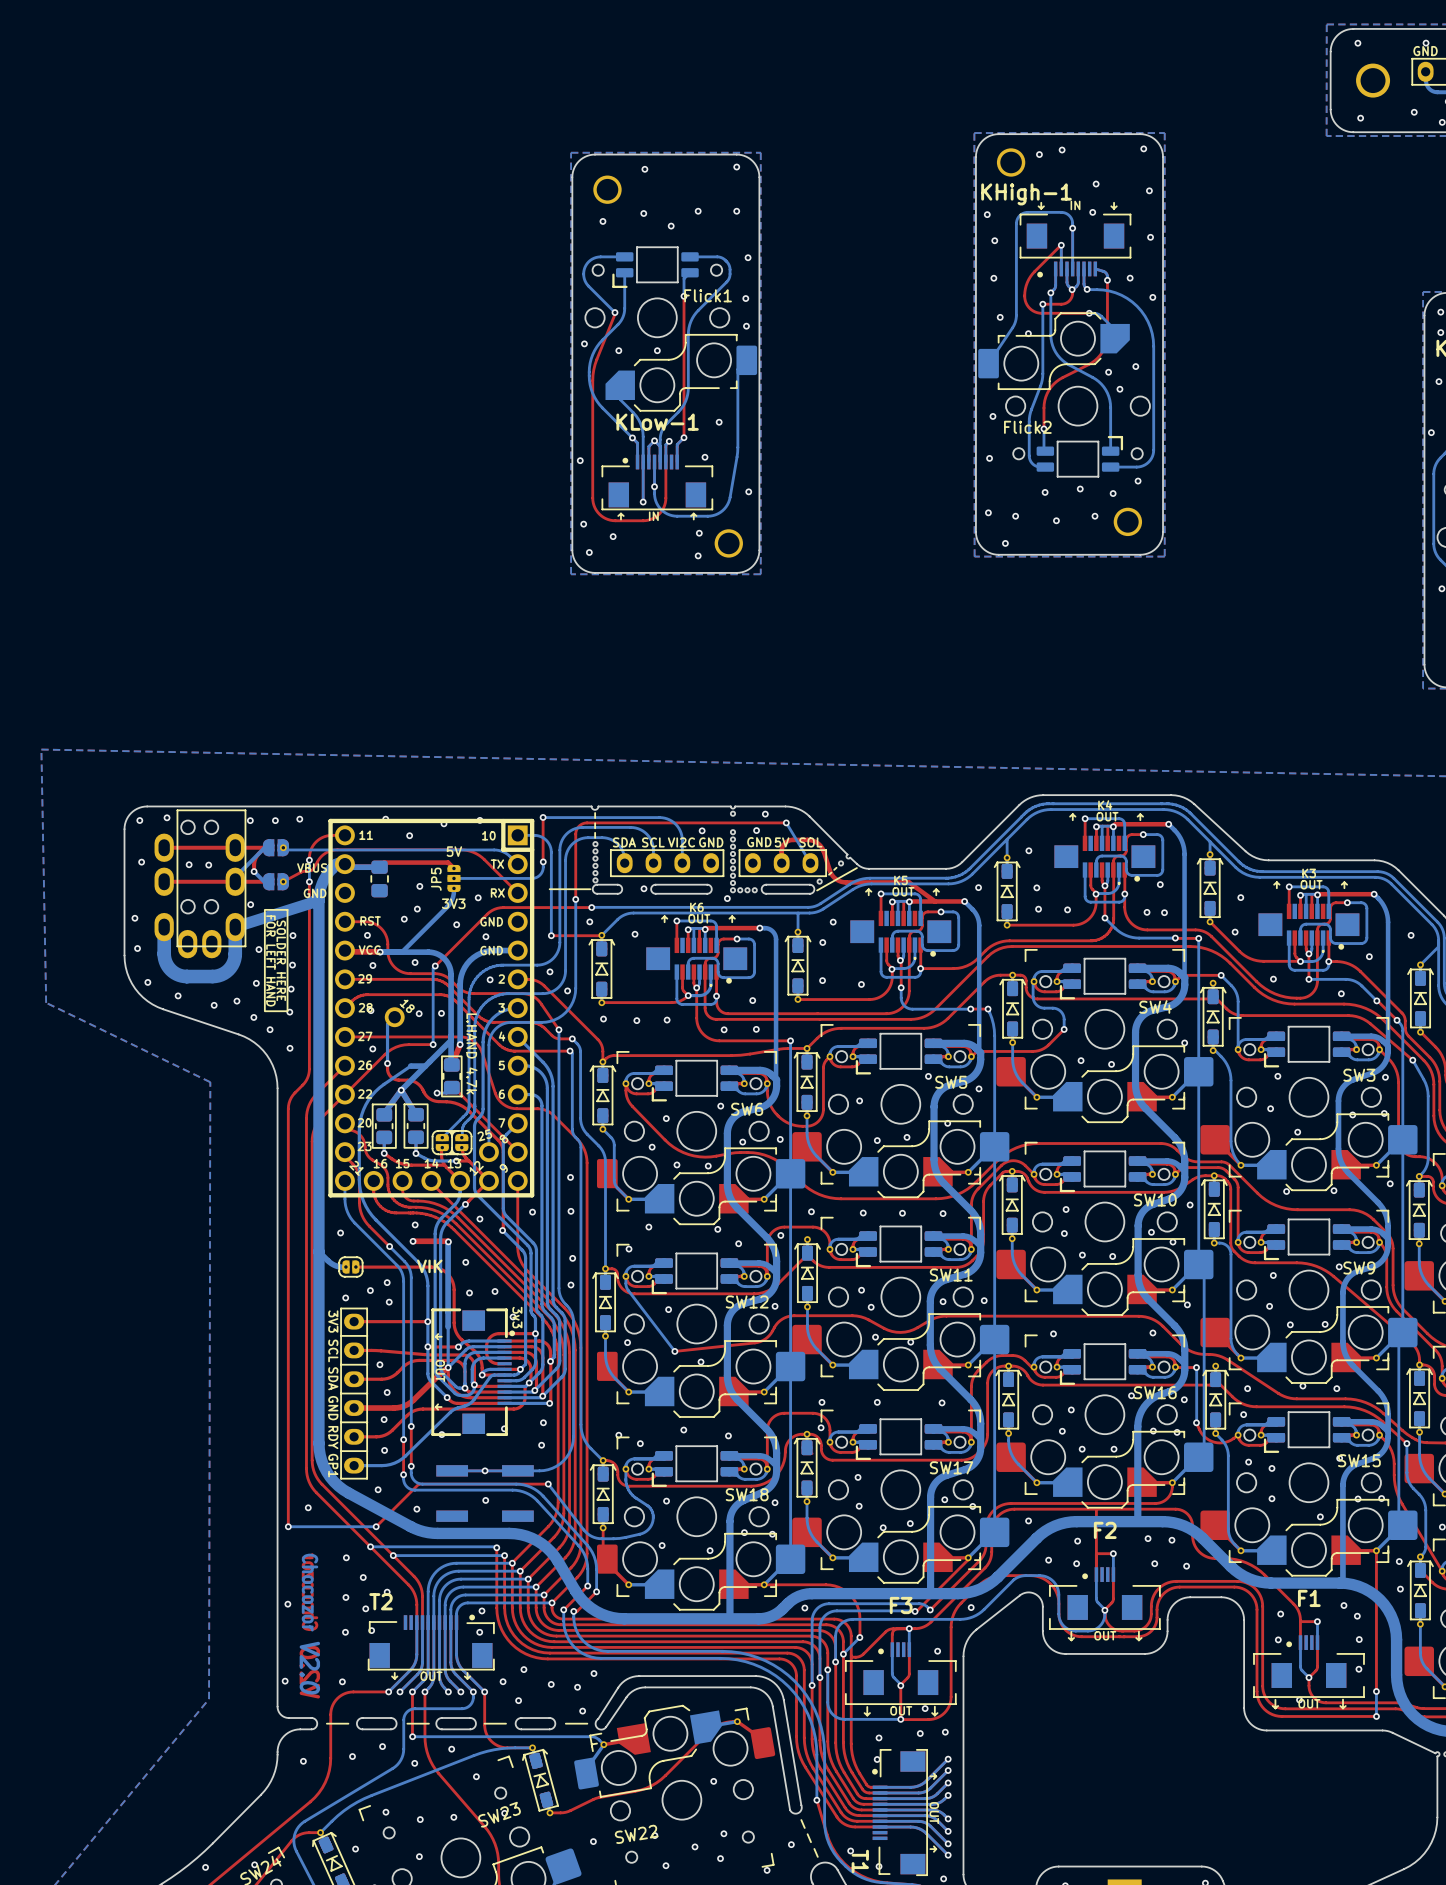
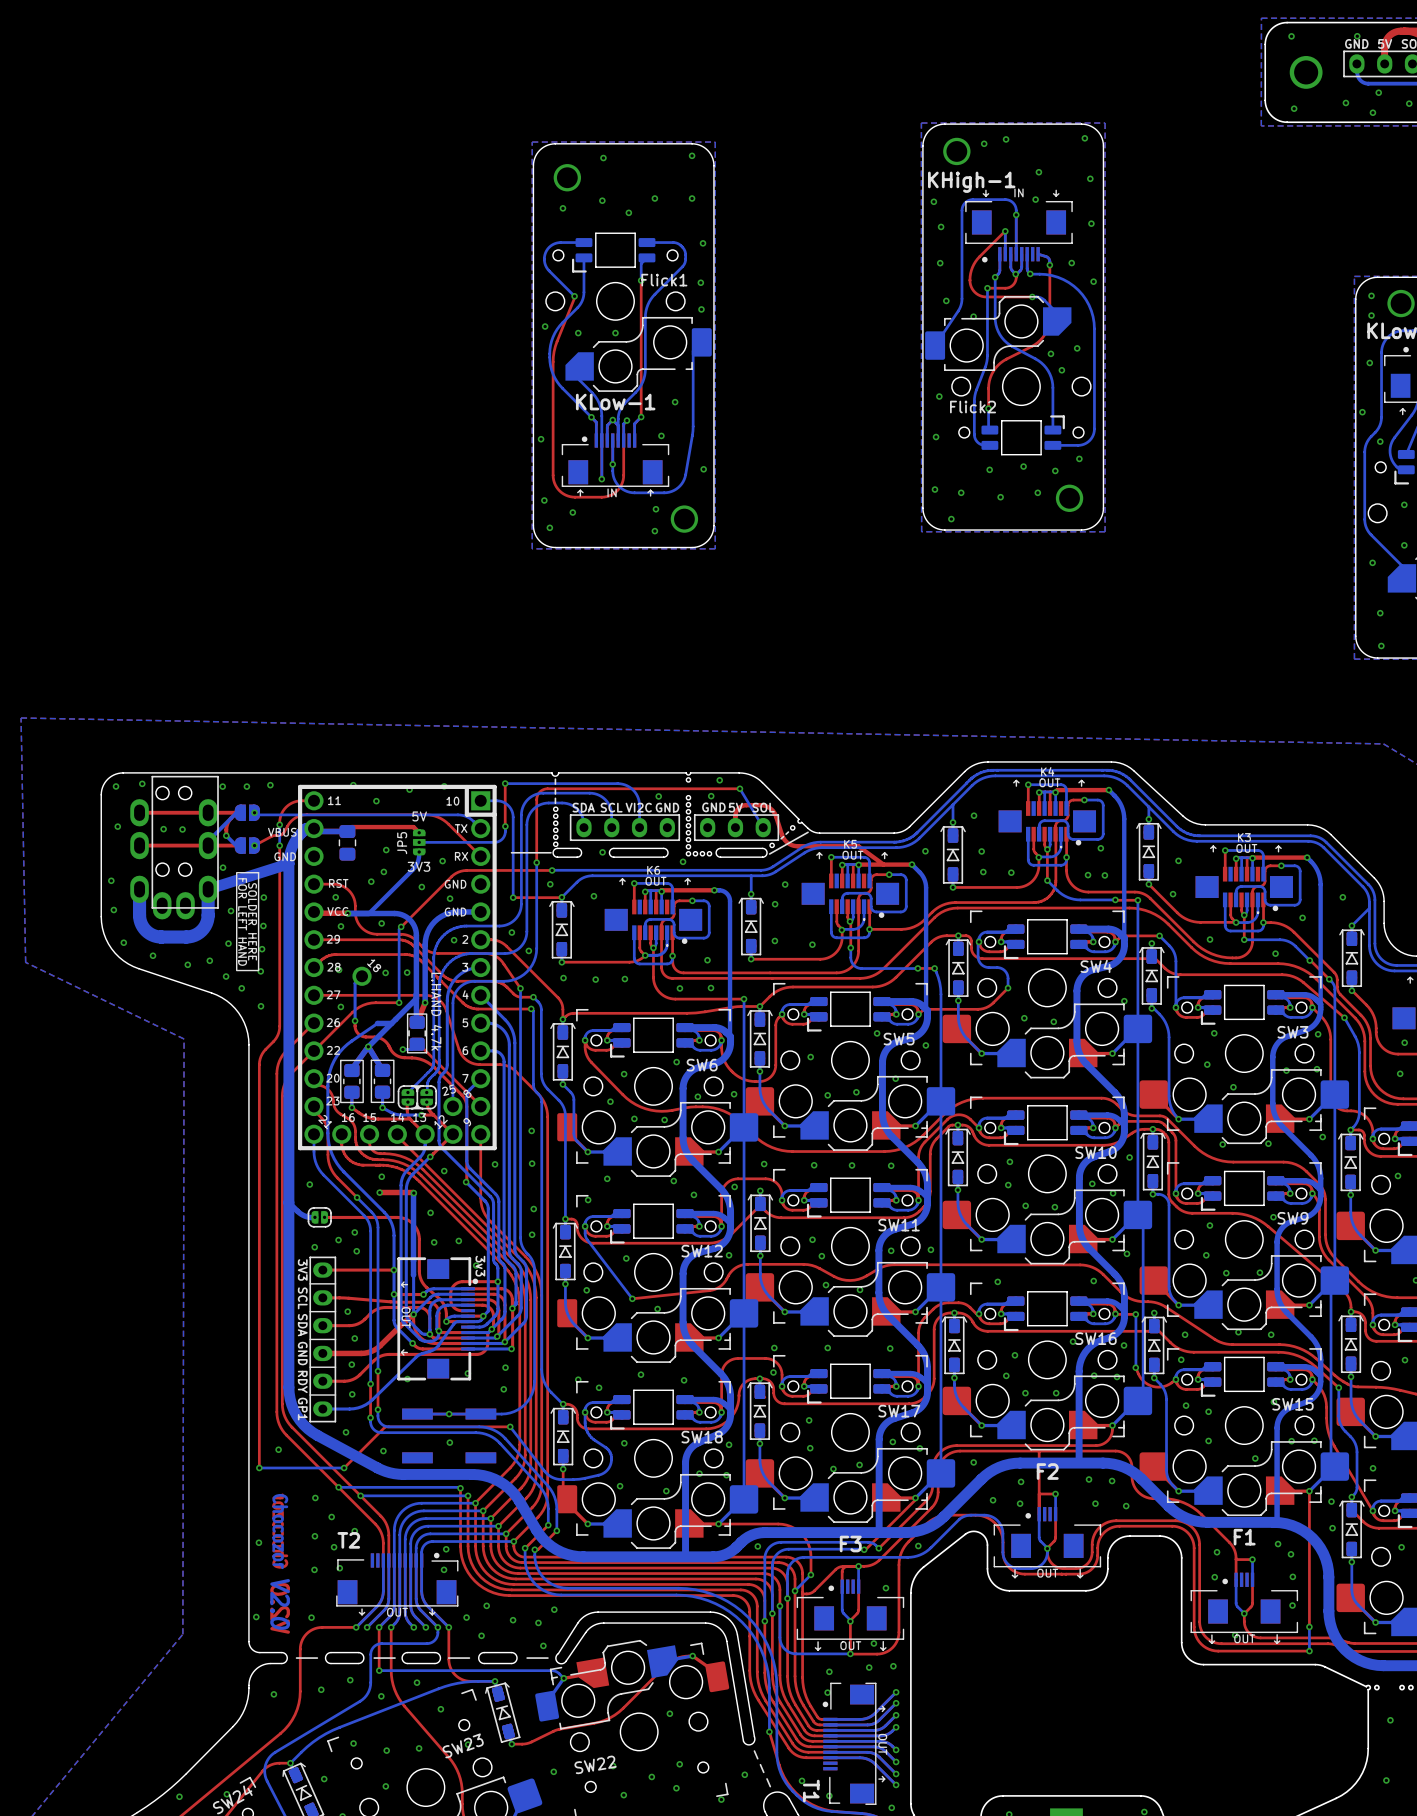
text: VIK (429, 1266) -> none

